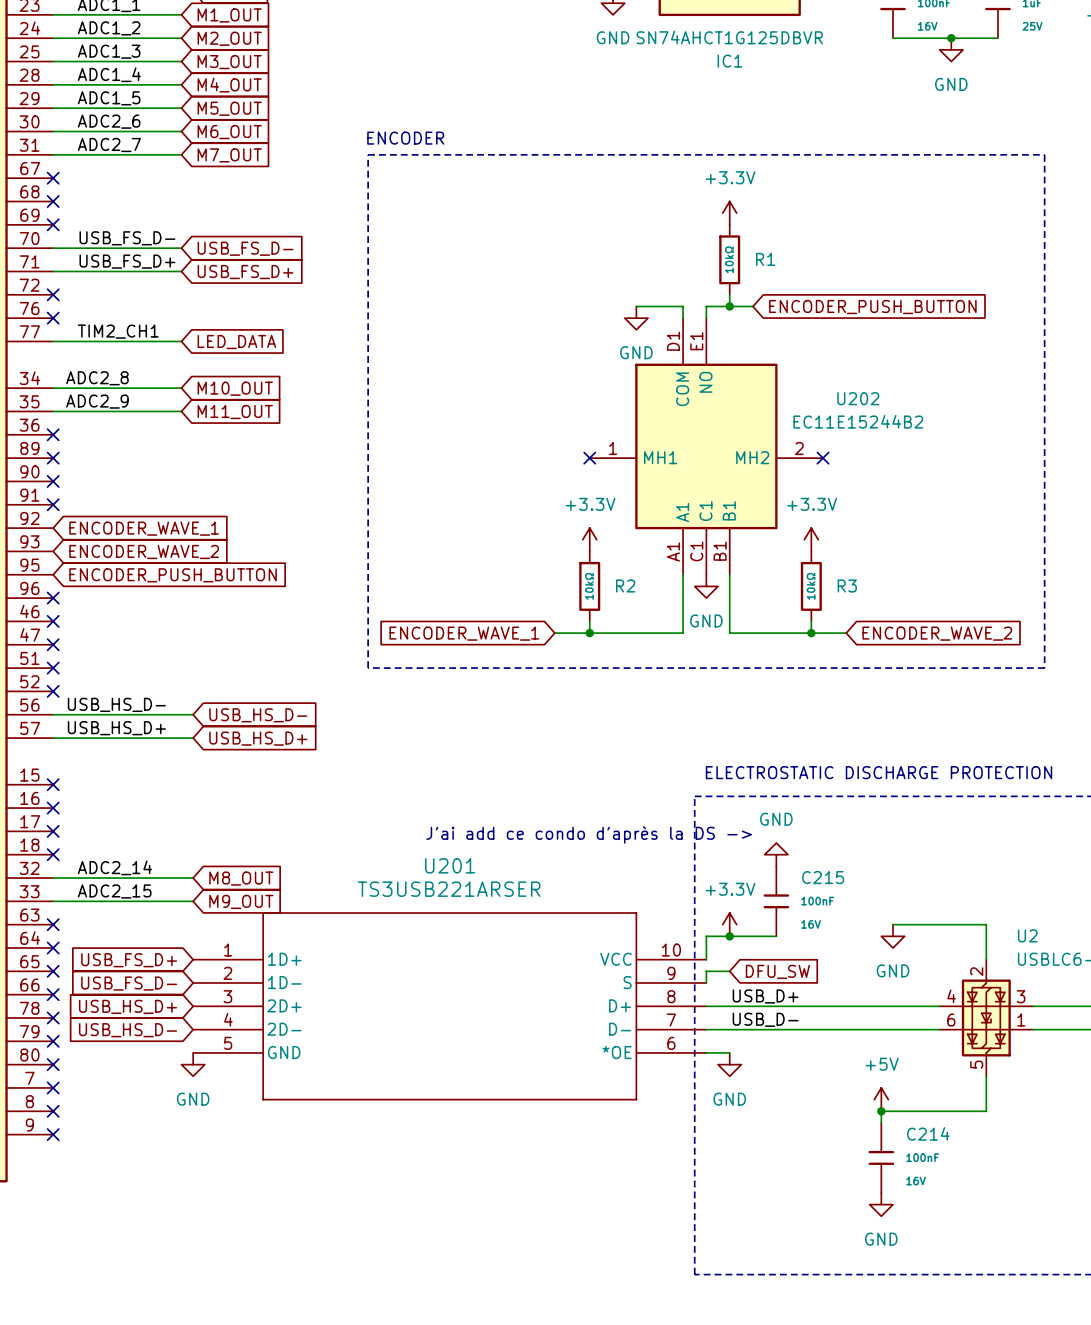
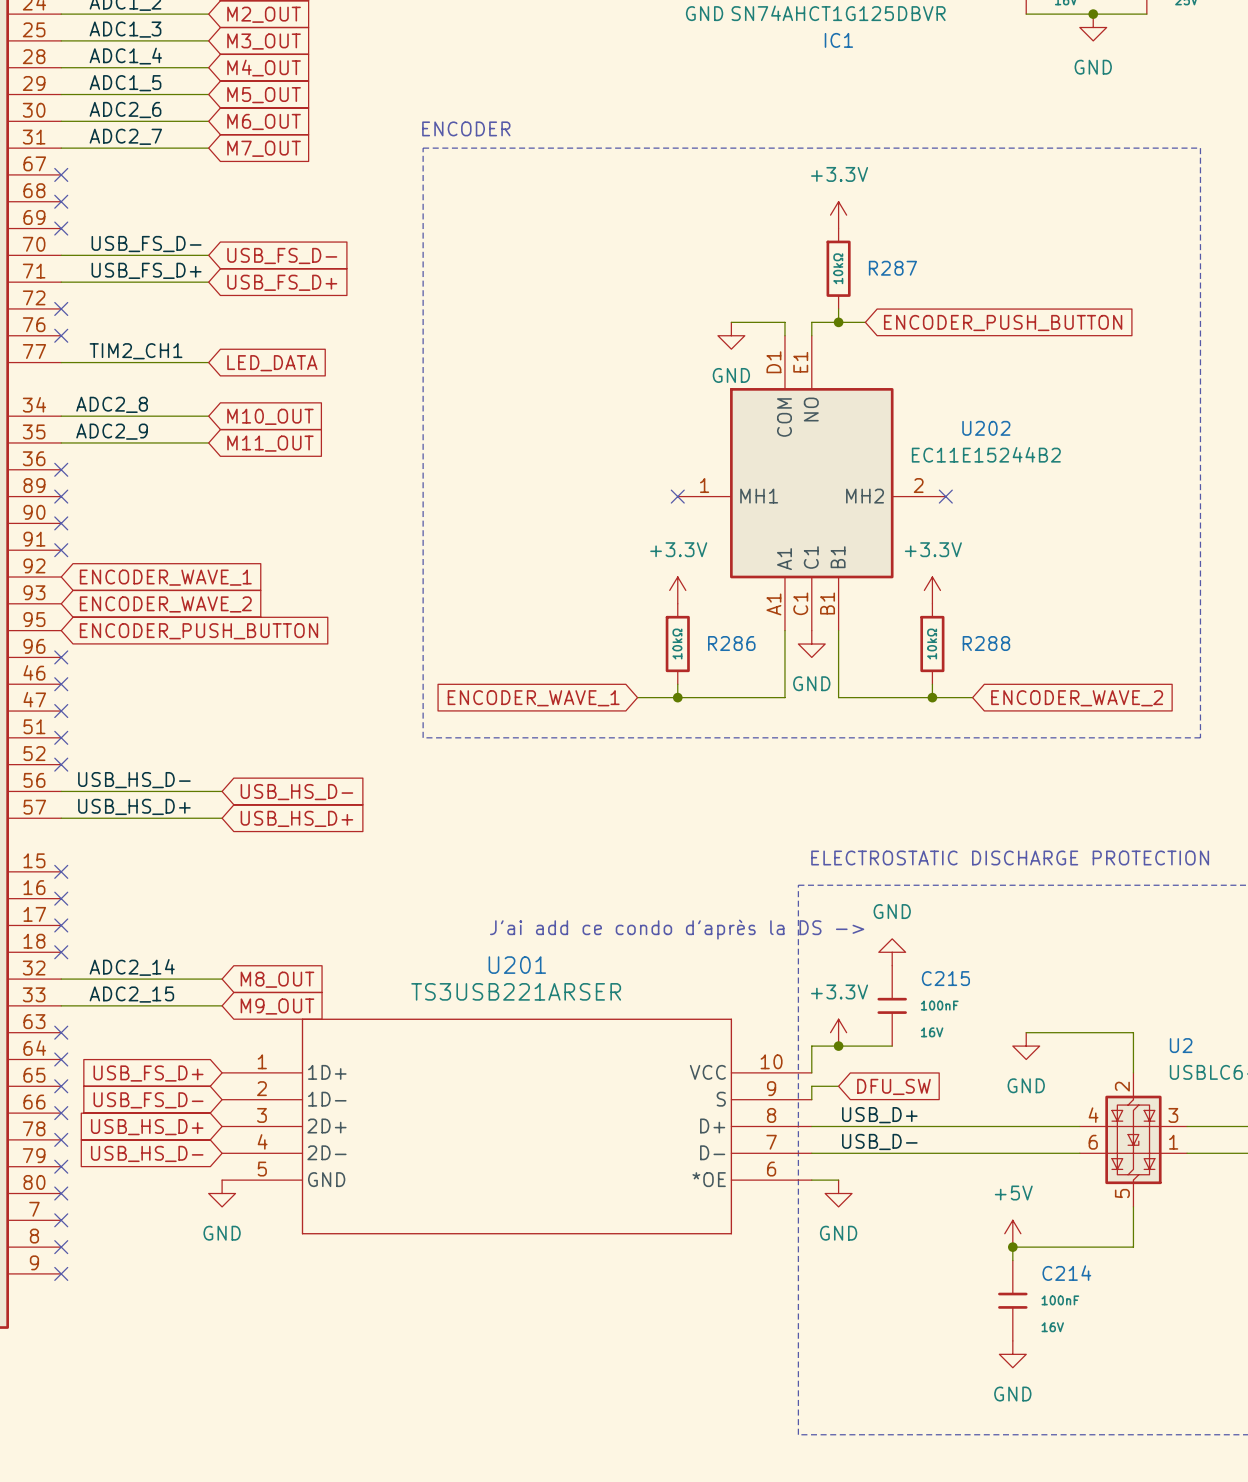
R1 name: R1 (765, 259) -> R287 (892, 268)
R2 name: R2 (625, 585) -> R286 (731, 643)
R3 name: R3 (847, 585) -> R288 (986, 643)

